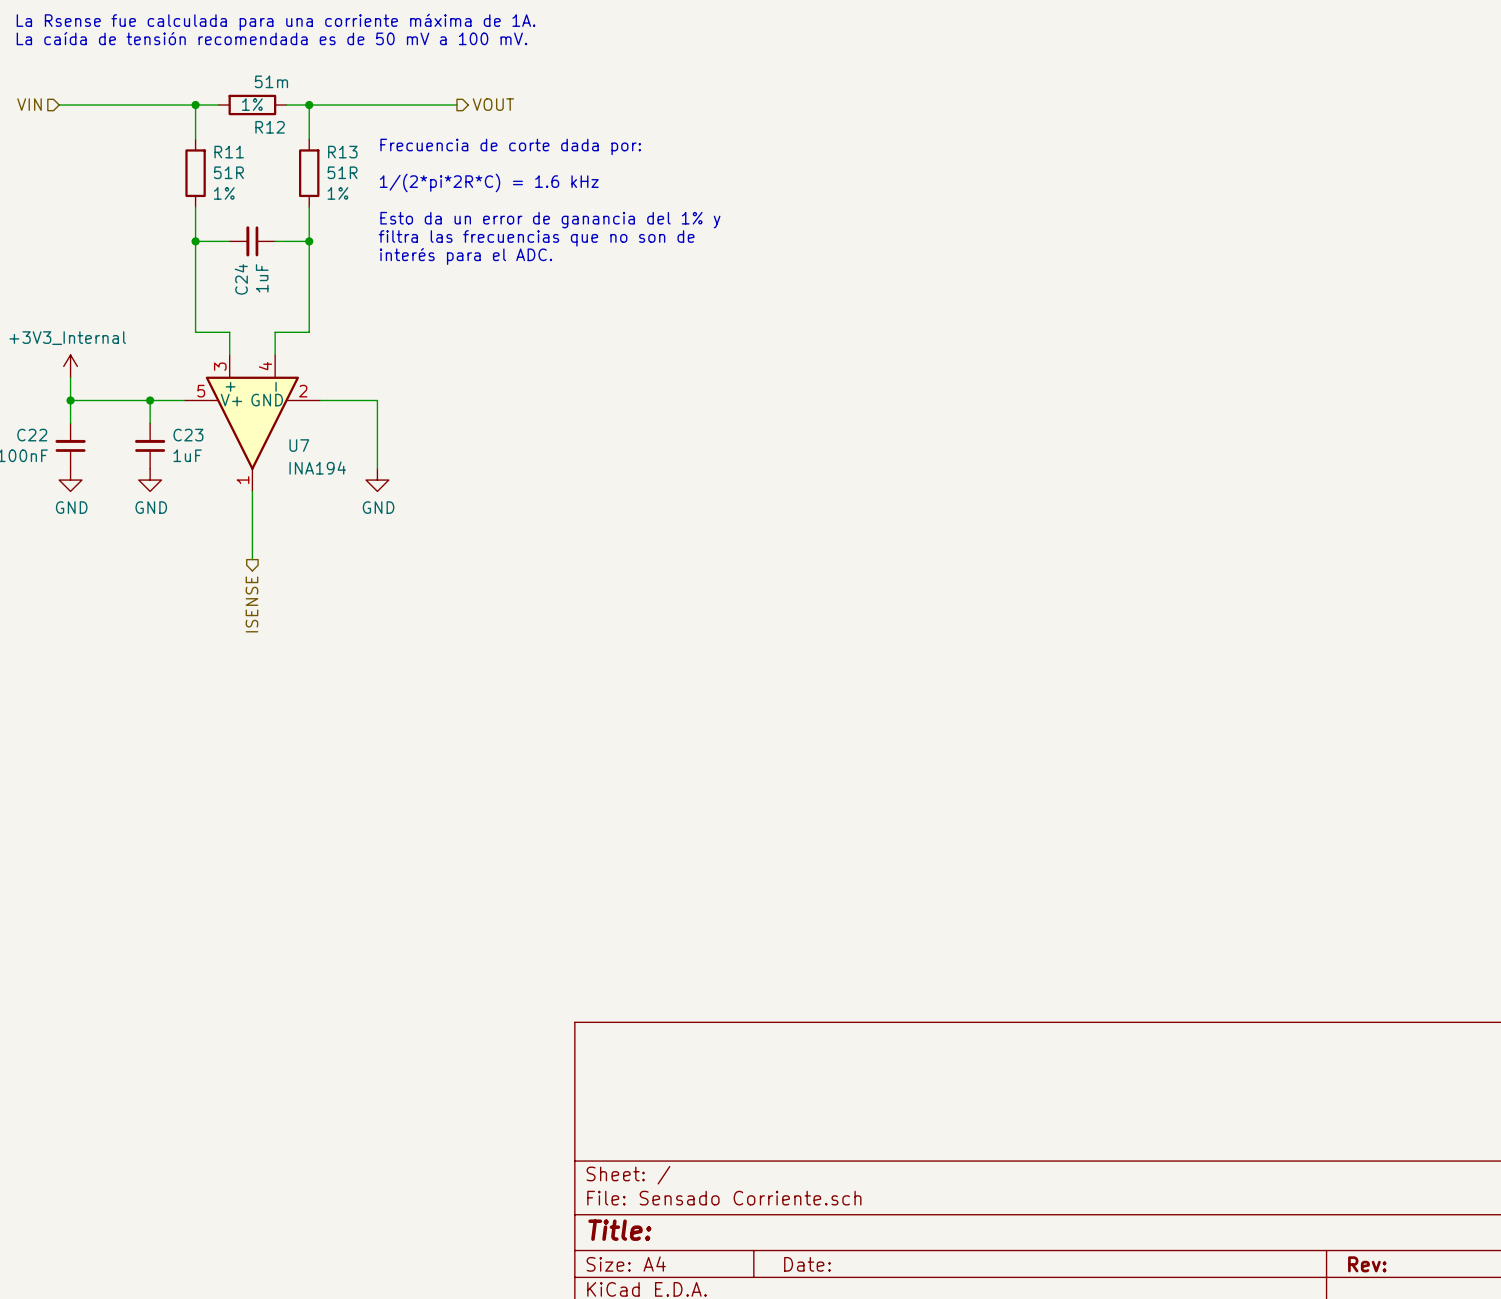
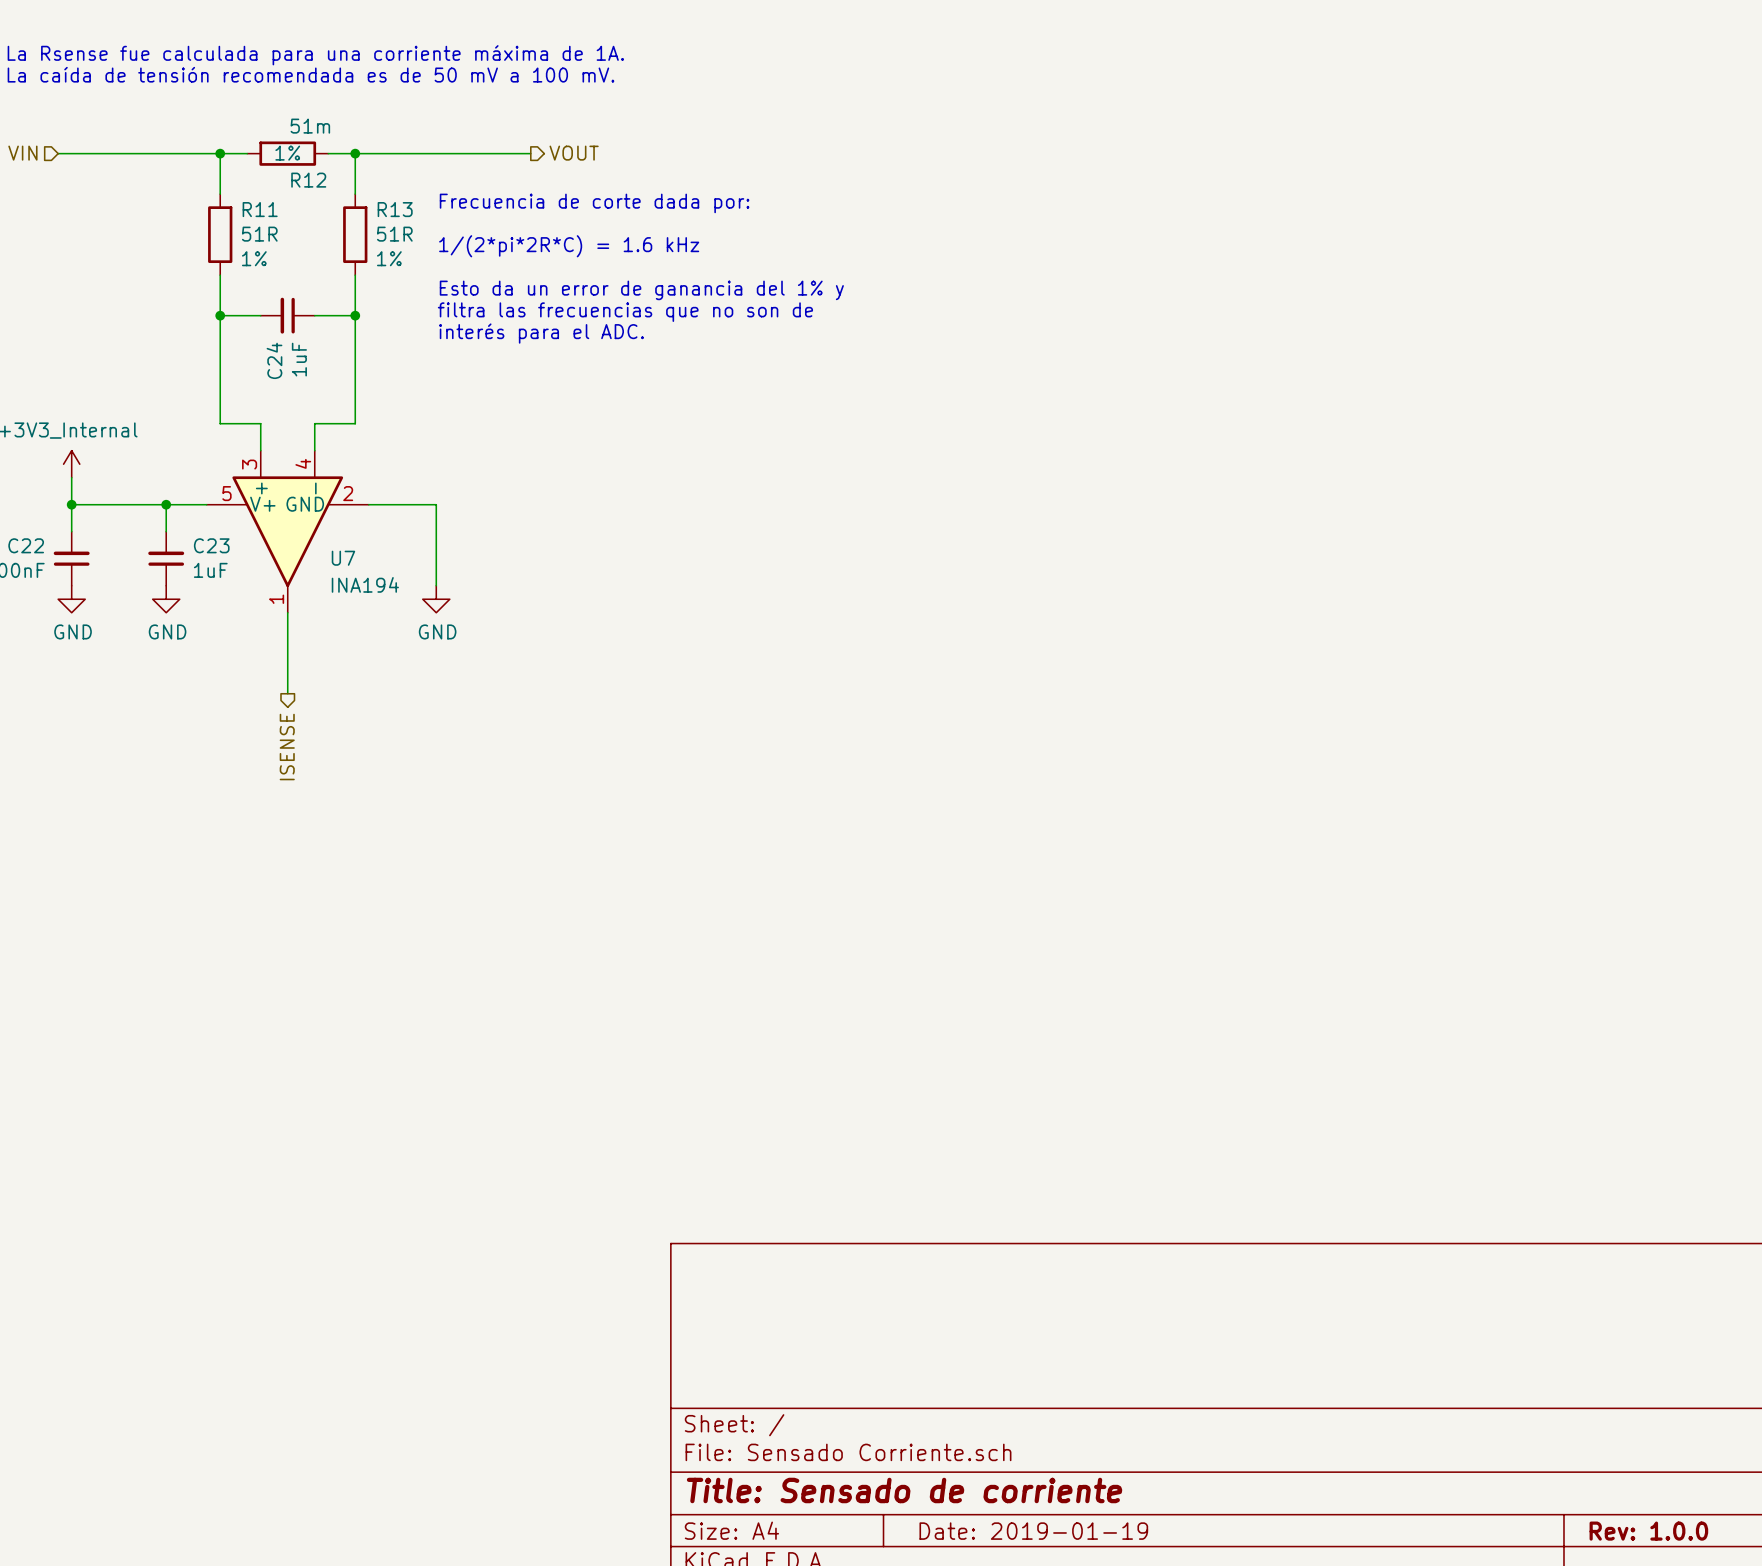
title block: Title: (619, 1230) -> Title: Sensado de corriente (904, 1490)
title block: Date: (807, 1264) -> Date: 2019-01-19 (1033, 1531)
title block: Rev: (1367, 1264) -> Rev: 1.0.0 (1648, 1531)

